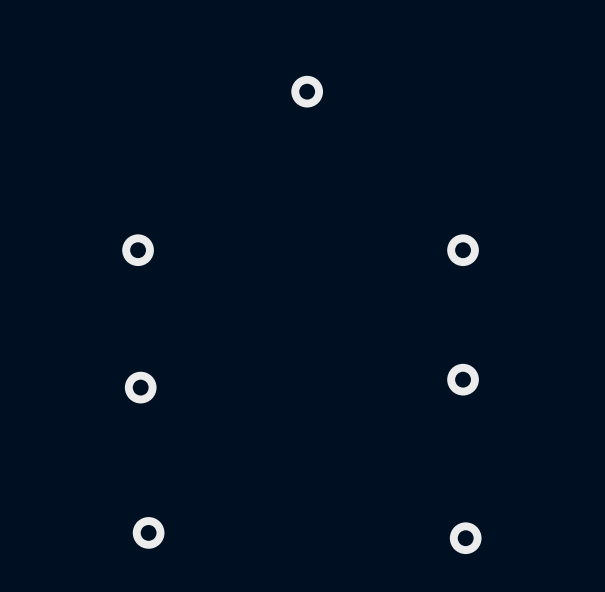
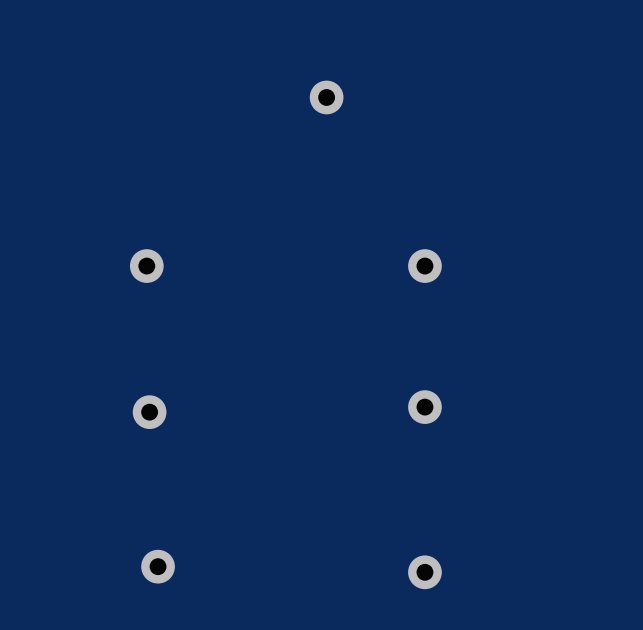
via position: (463, 250) -> (424, 266)
via position: (463, 379) -> (424, 407)
via position: (465, 538) -> (424, 572)

